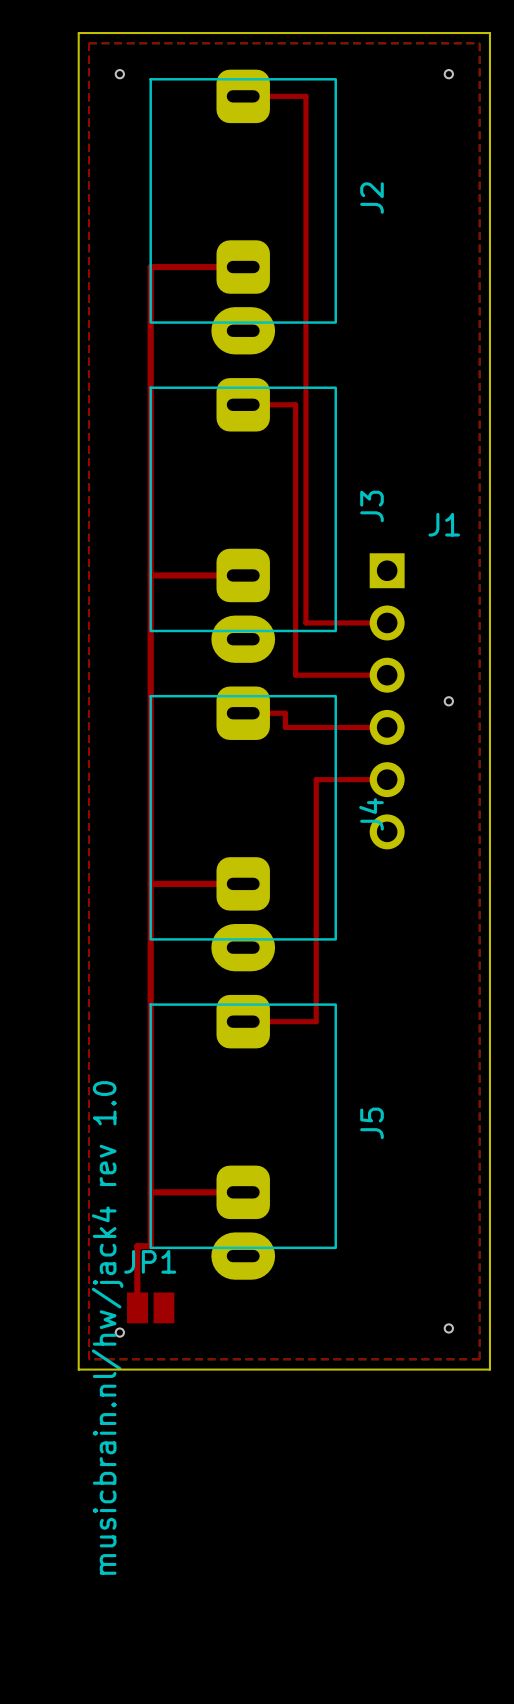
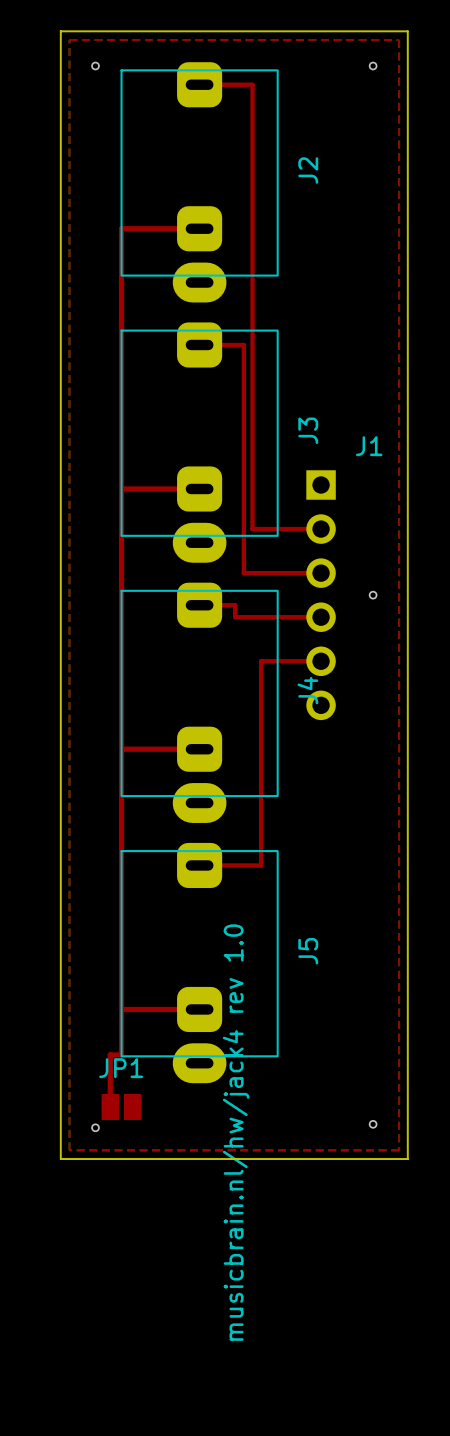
text position: musicbrain.nl/hw/jack4 rev 1.0 (107, 1327) -> musicbrain.nl/hw/jack4 rev 1.0 (236, 1132)

